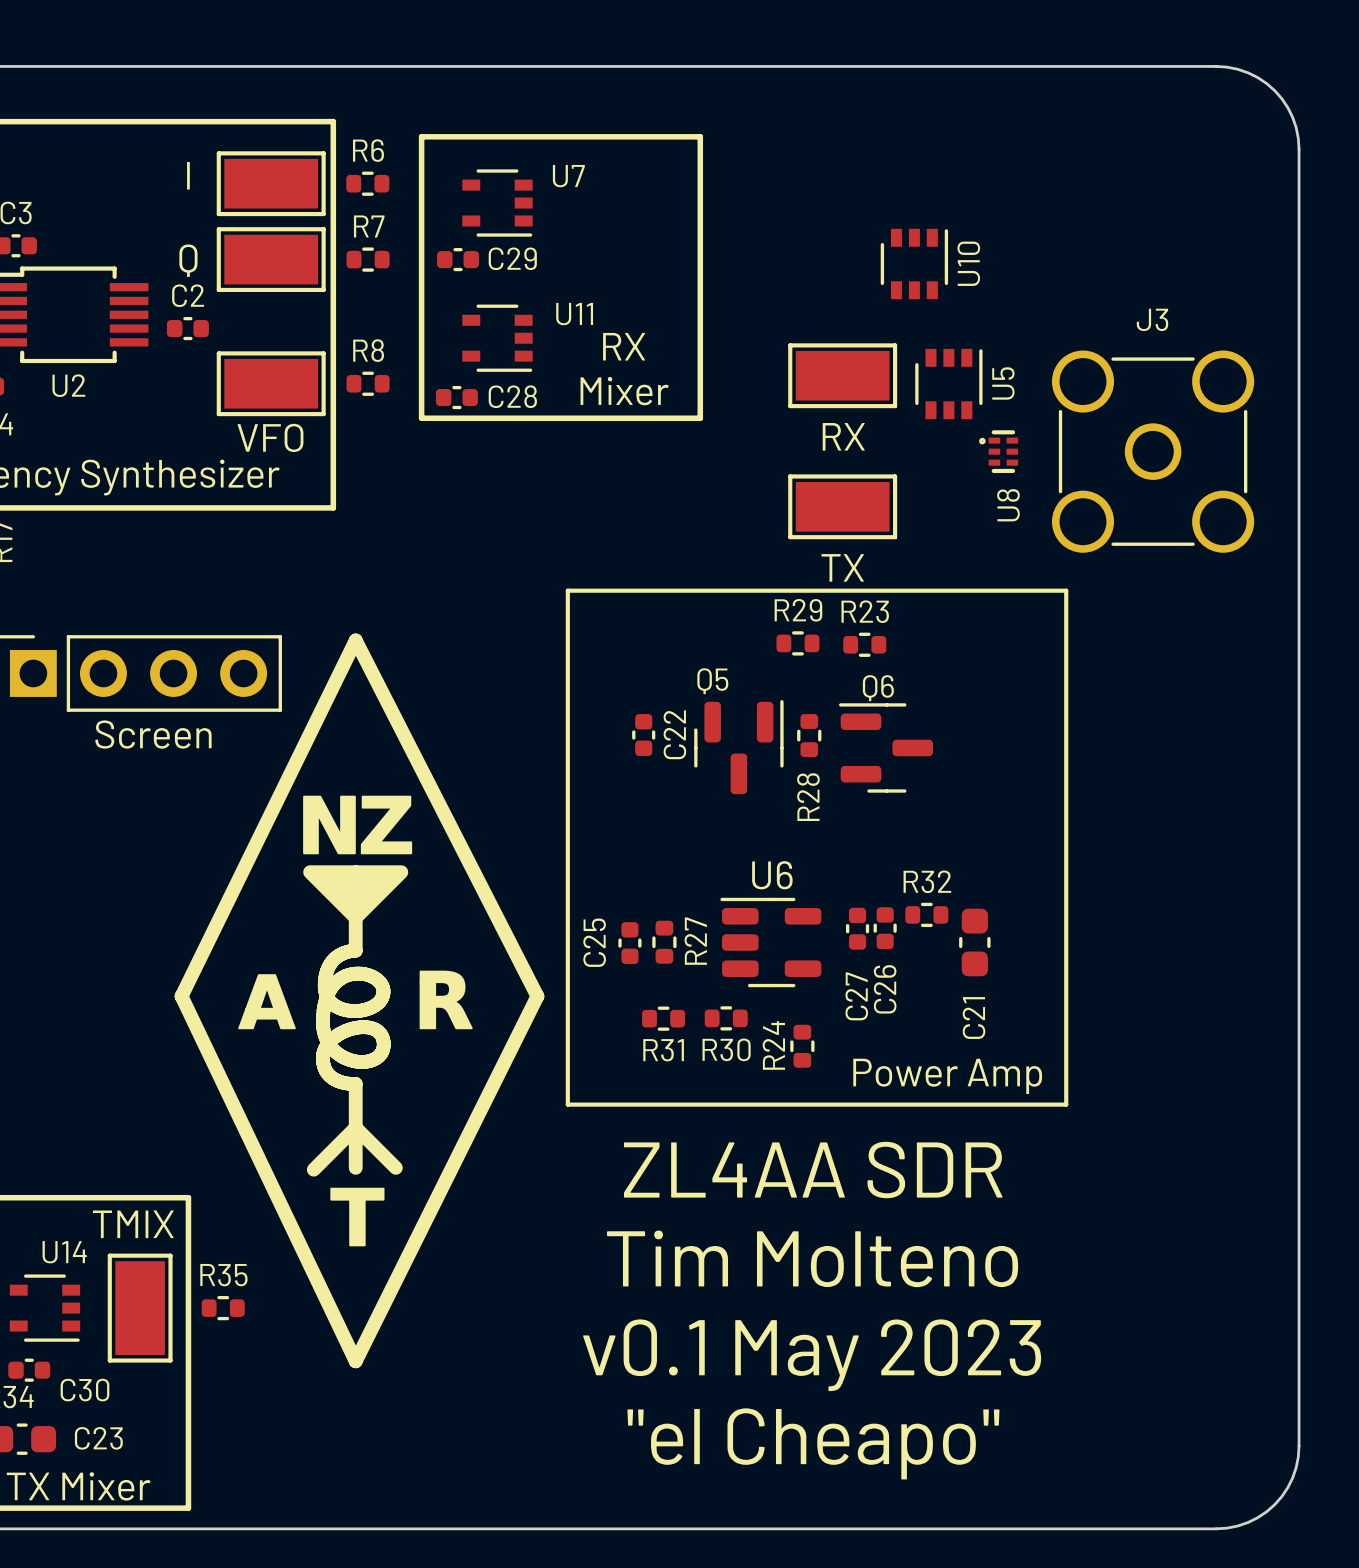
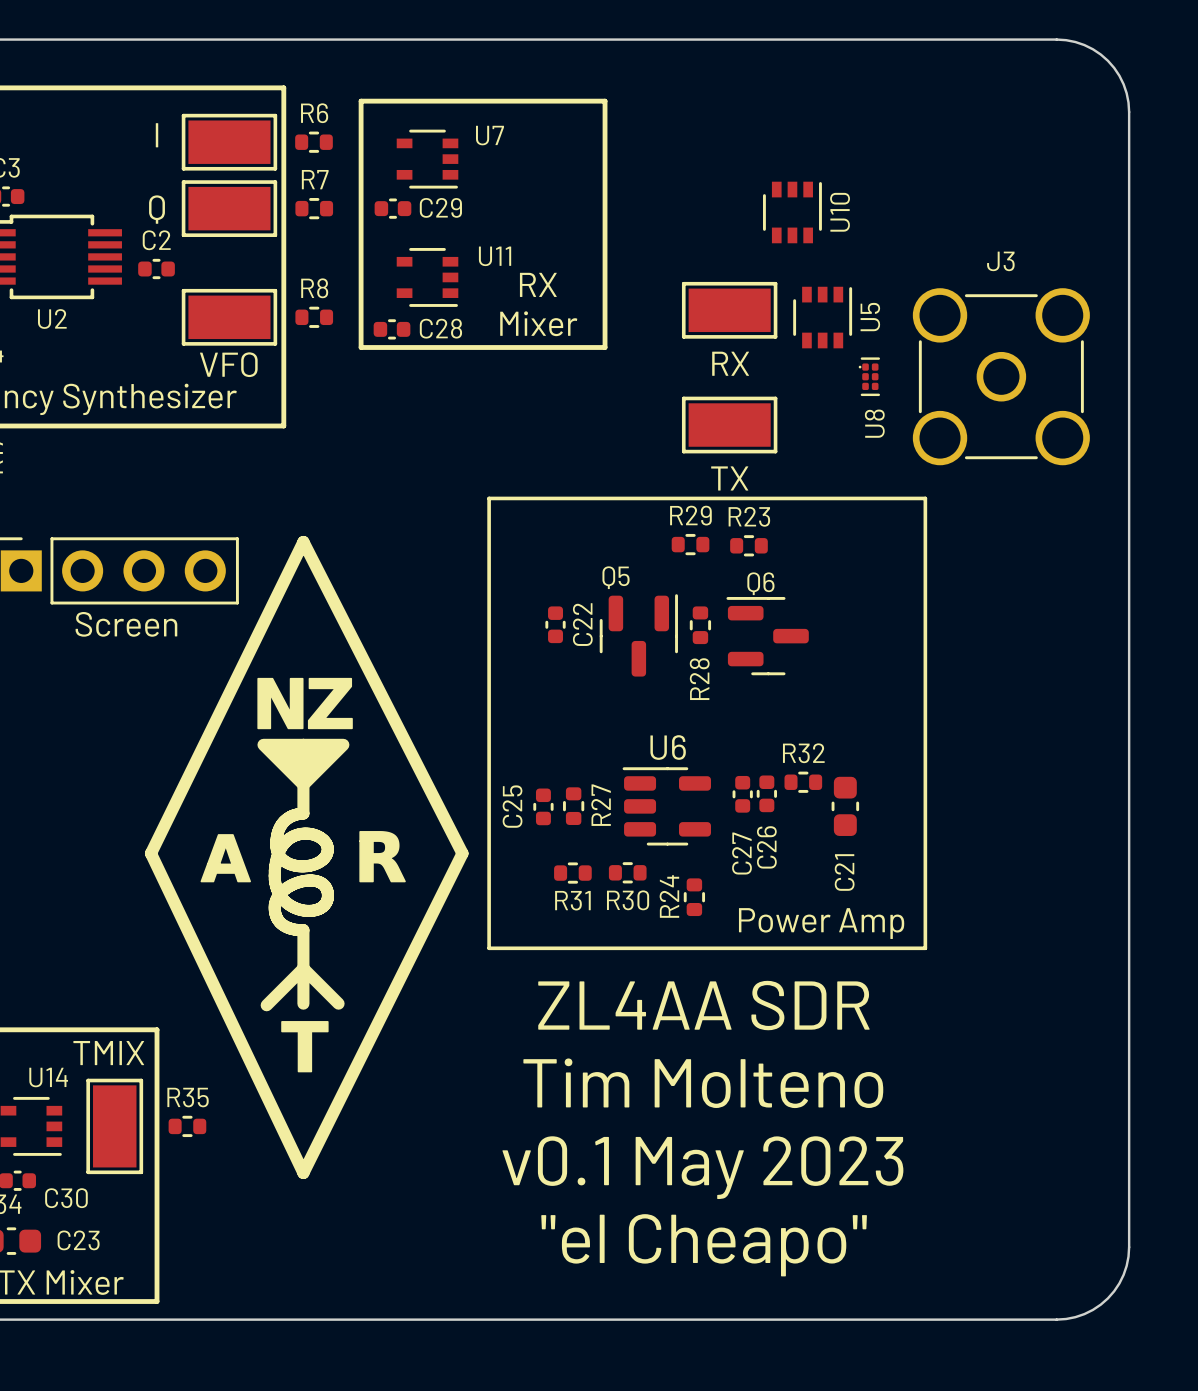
U8 footprint: [979, 430, 1019, 474] -> [858, 357, 881, 397]

